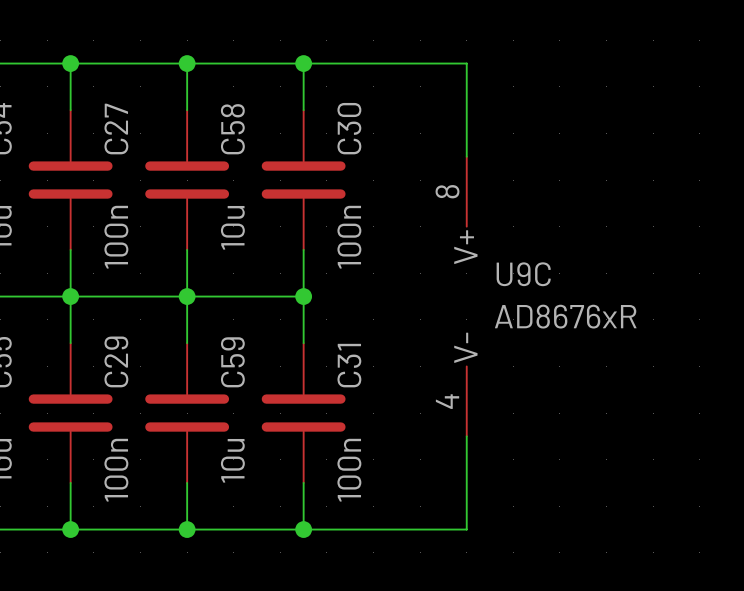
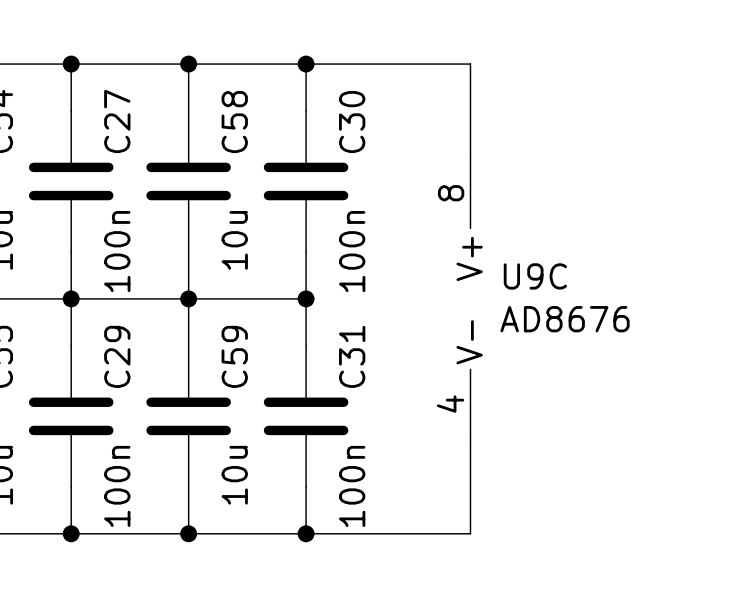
U9C value: AD8676xR (565, 316) -> AD8676 (565, 319)

